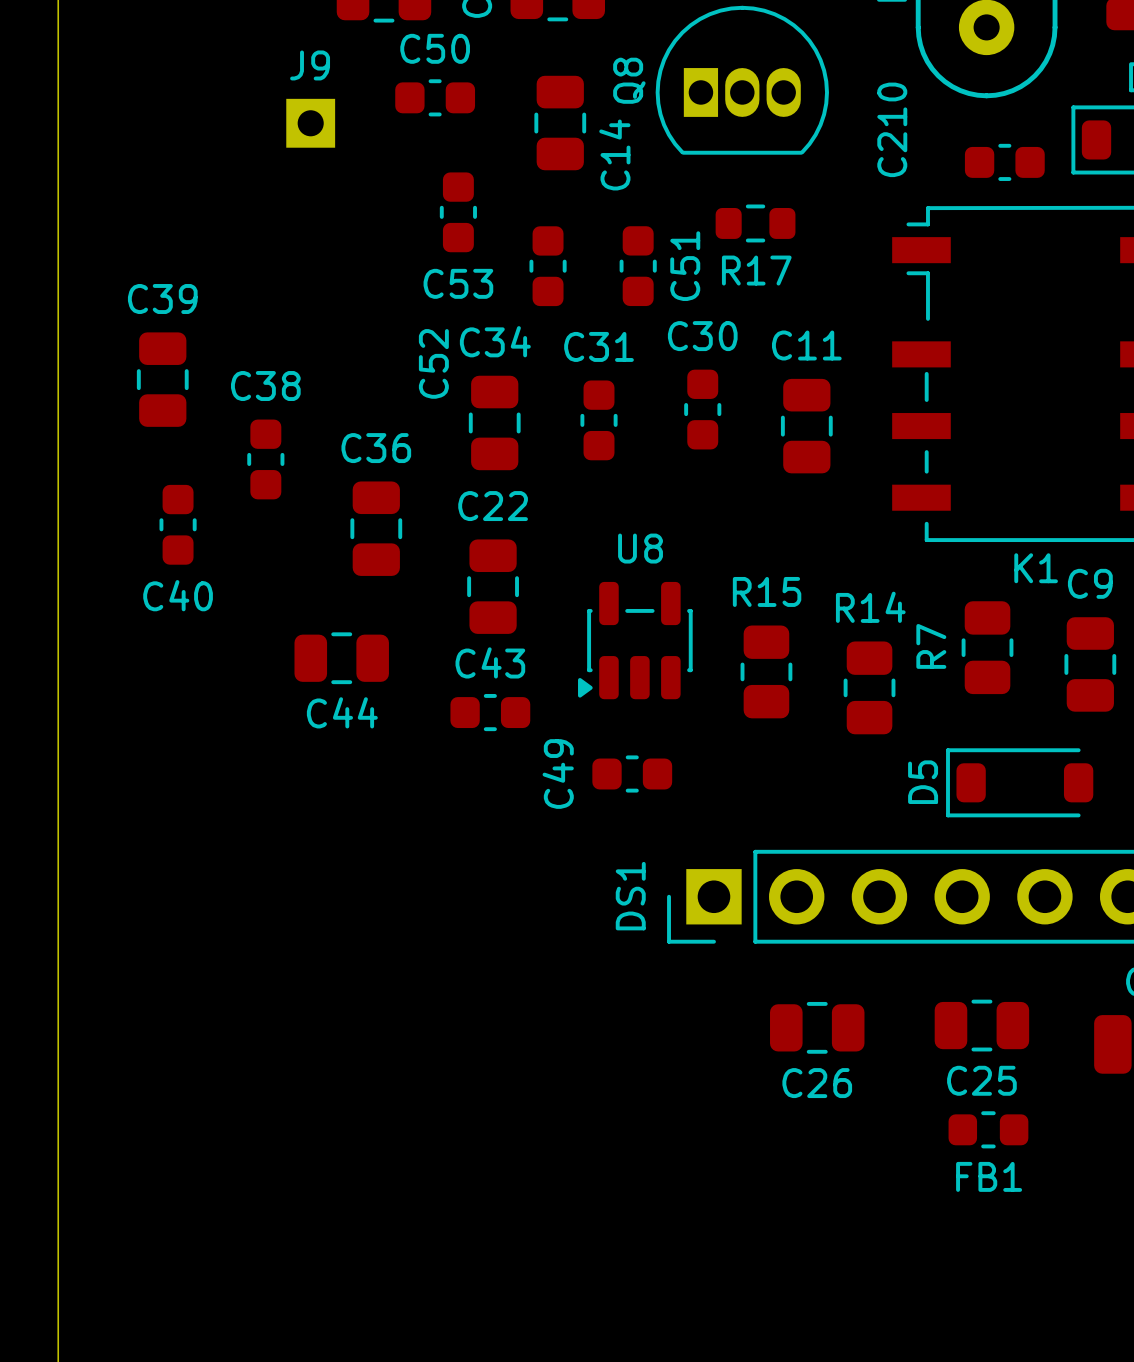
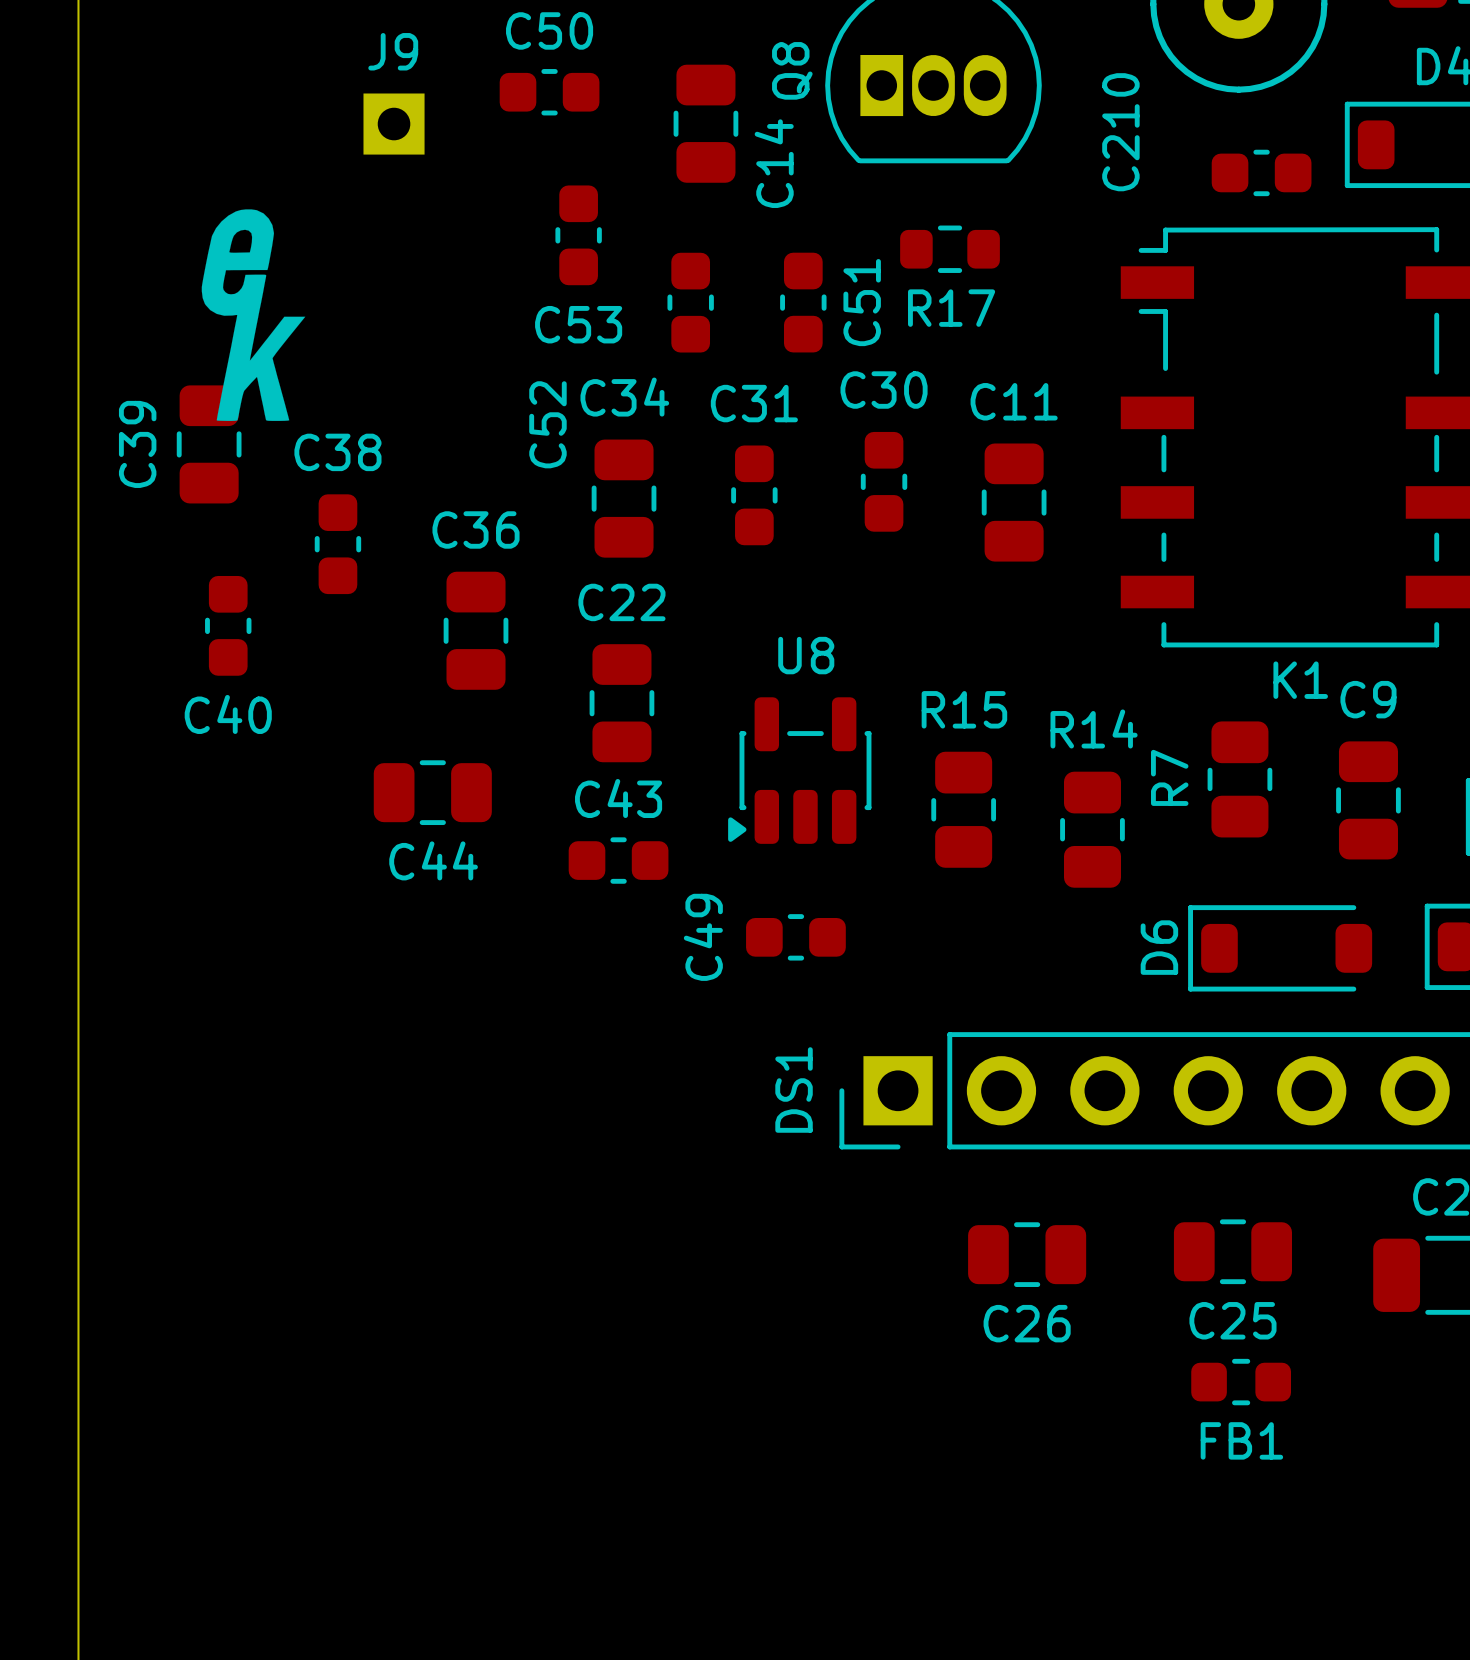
drawing: none -> [201, 209, 306, 421]
C39 name rotation: 0° (162, 299) -> 90° counterclockwise (137, 444)
C39 name position: C39 (162, 299) -> C39 (137, 444)
D5 name: D5 (923, 782) -> D6 (1159, 947)

